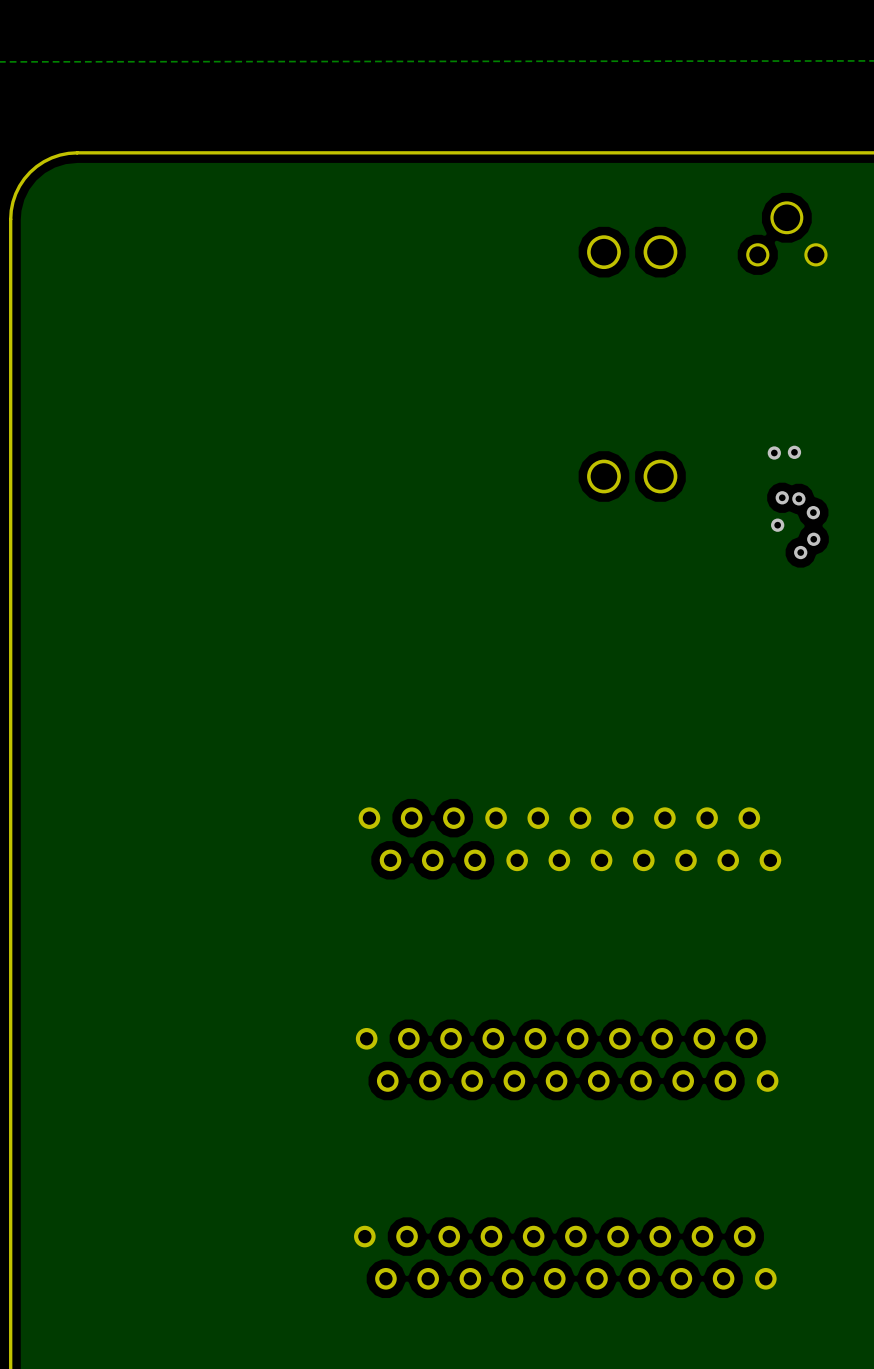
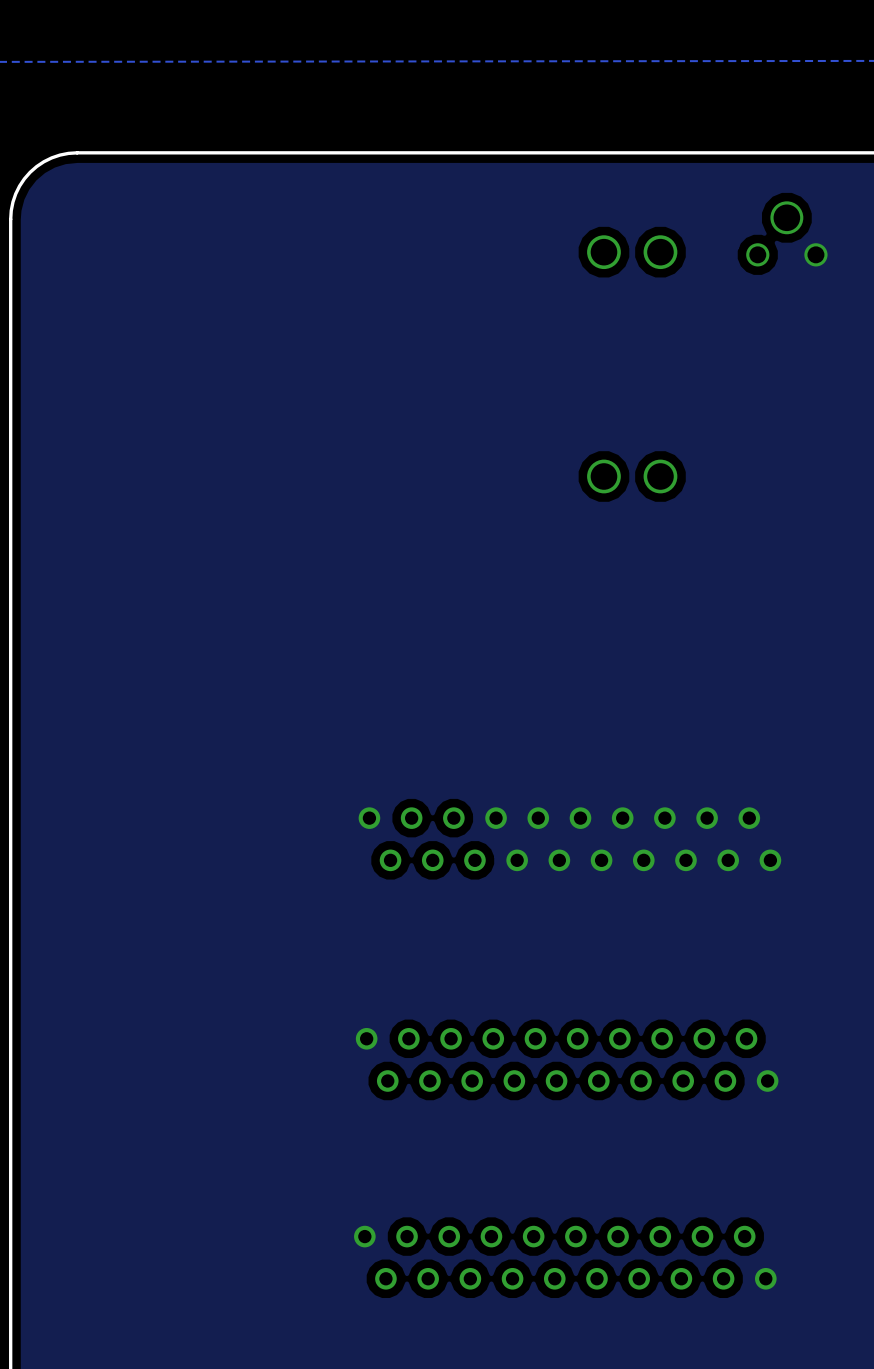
via: (794, 452) -> none
via: (774, 453) -> none
via: (782, 497) -> none
via: (798, 498) -> none
via: (813, 512) -> none
via: (777, 525) -> none
via: (813, 539) -> none
via: (800, 552) -> none

